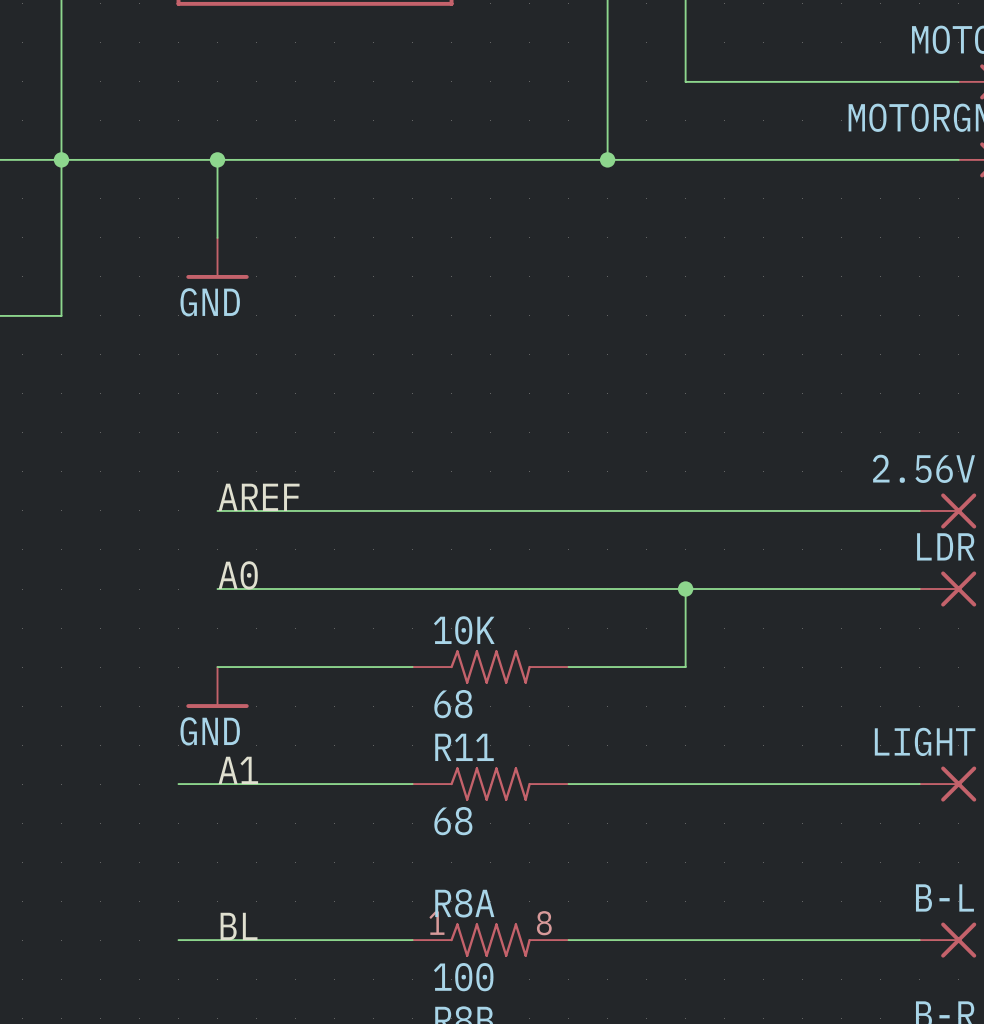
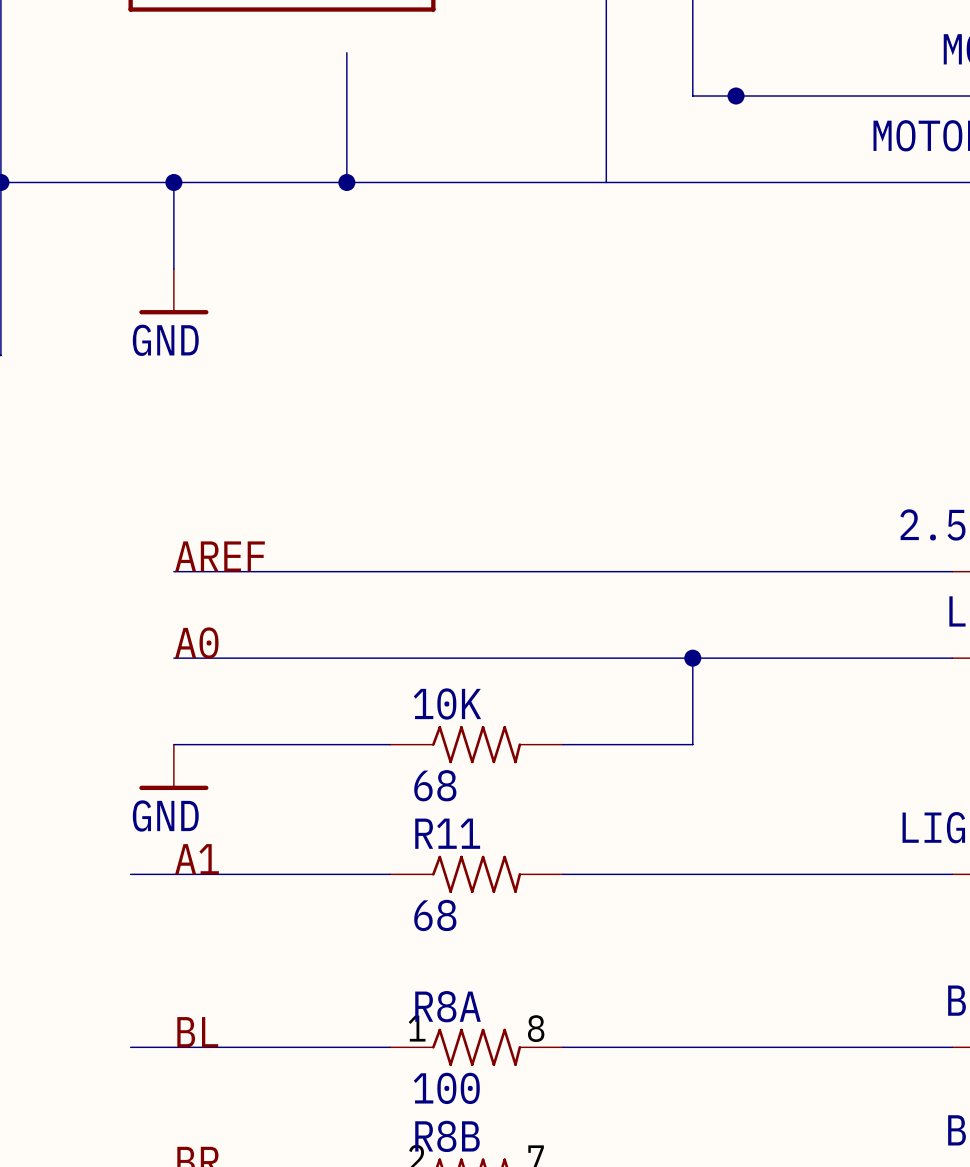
wire: none -> (346, 52) (346, 182)
junction: none -> (736, 96)
junction: none -> (346, 182)
junction: (607, 159) -> none

